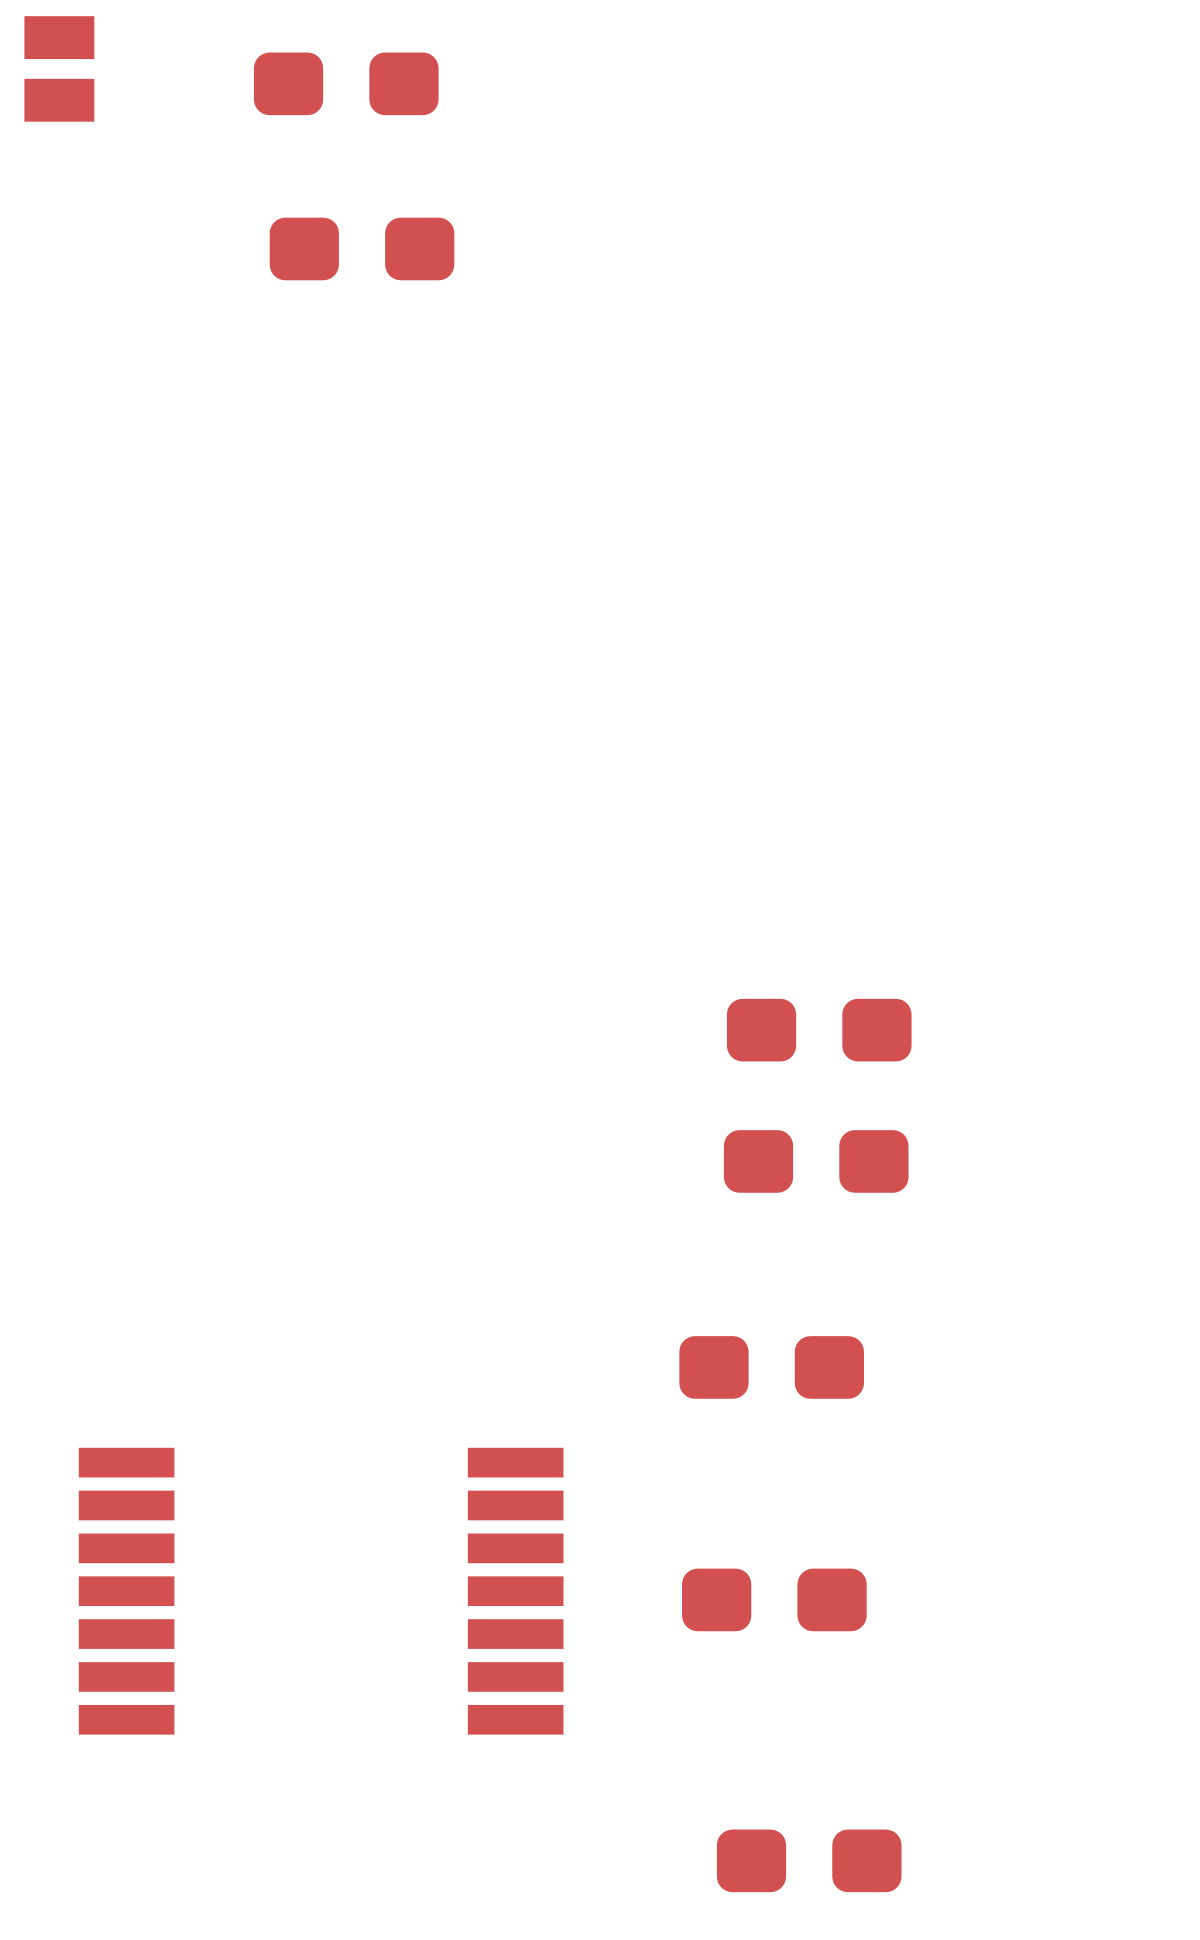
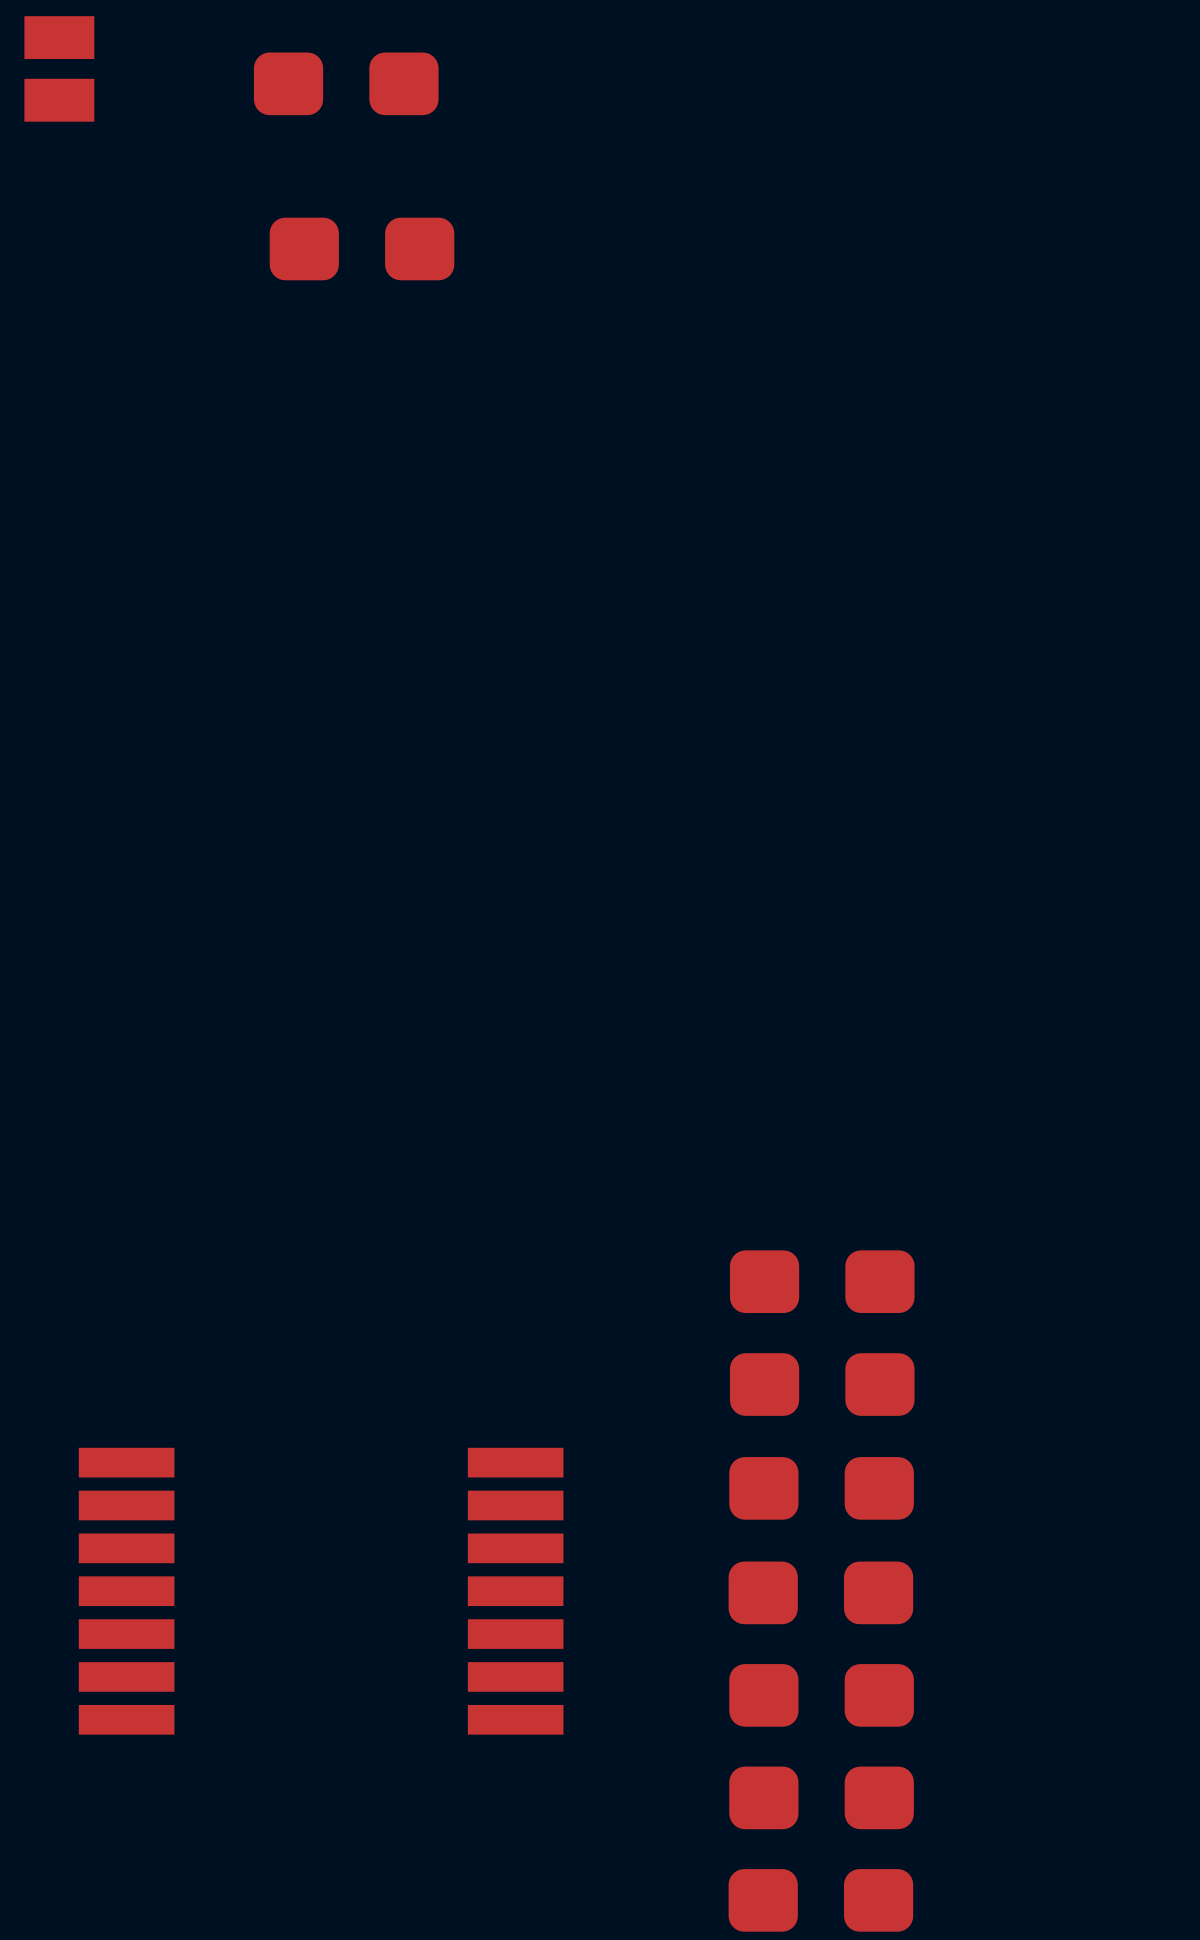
part: (819, 1030) -> none
part: (816, 1161) -> none
part: none -> (822, 1281)
part: (771, 1367) -> none
part: none -> (822, 1384)
part: none -> (821, 1488)
part position: (774, 1599) -> (820, 1592)
part: none -> (821, 1695)
part: none -> (821, 1797)
part: (809, 1860) -> none
part: none -> (820, 1900)

